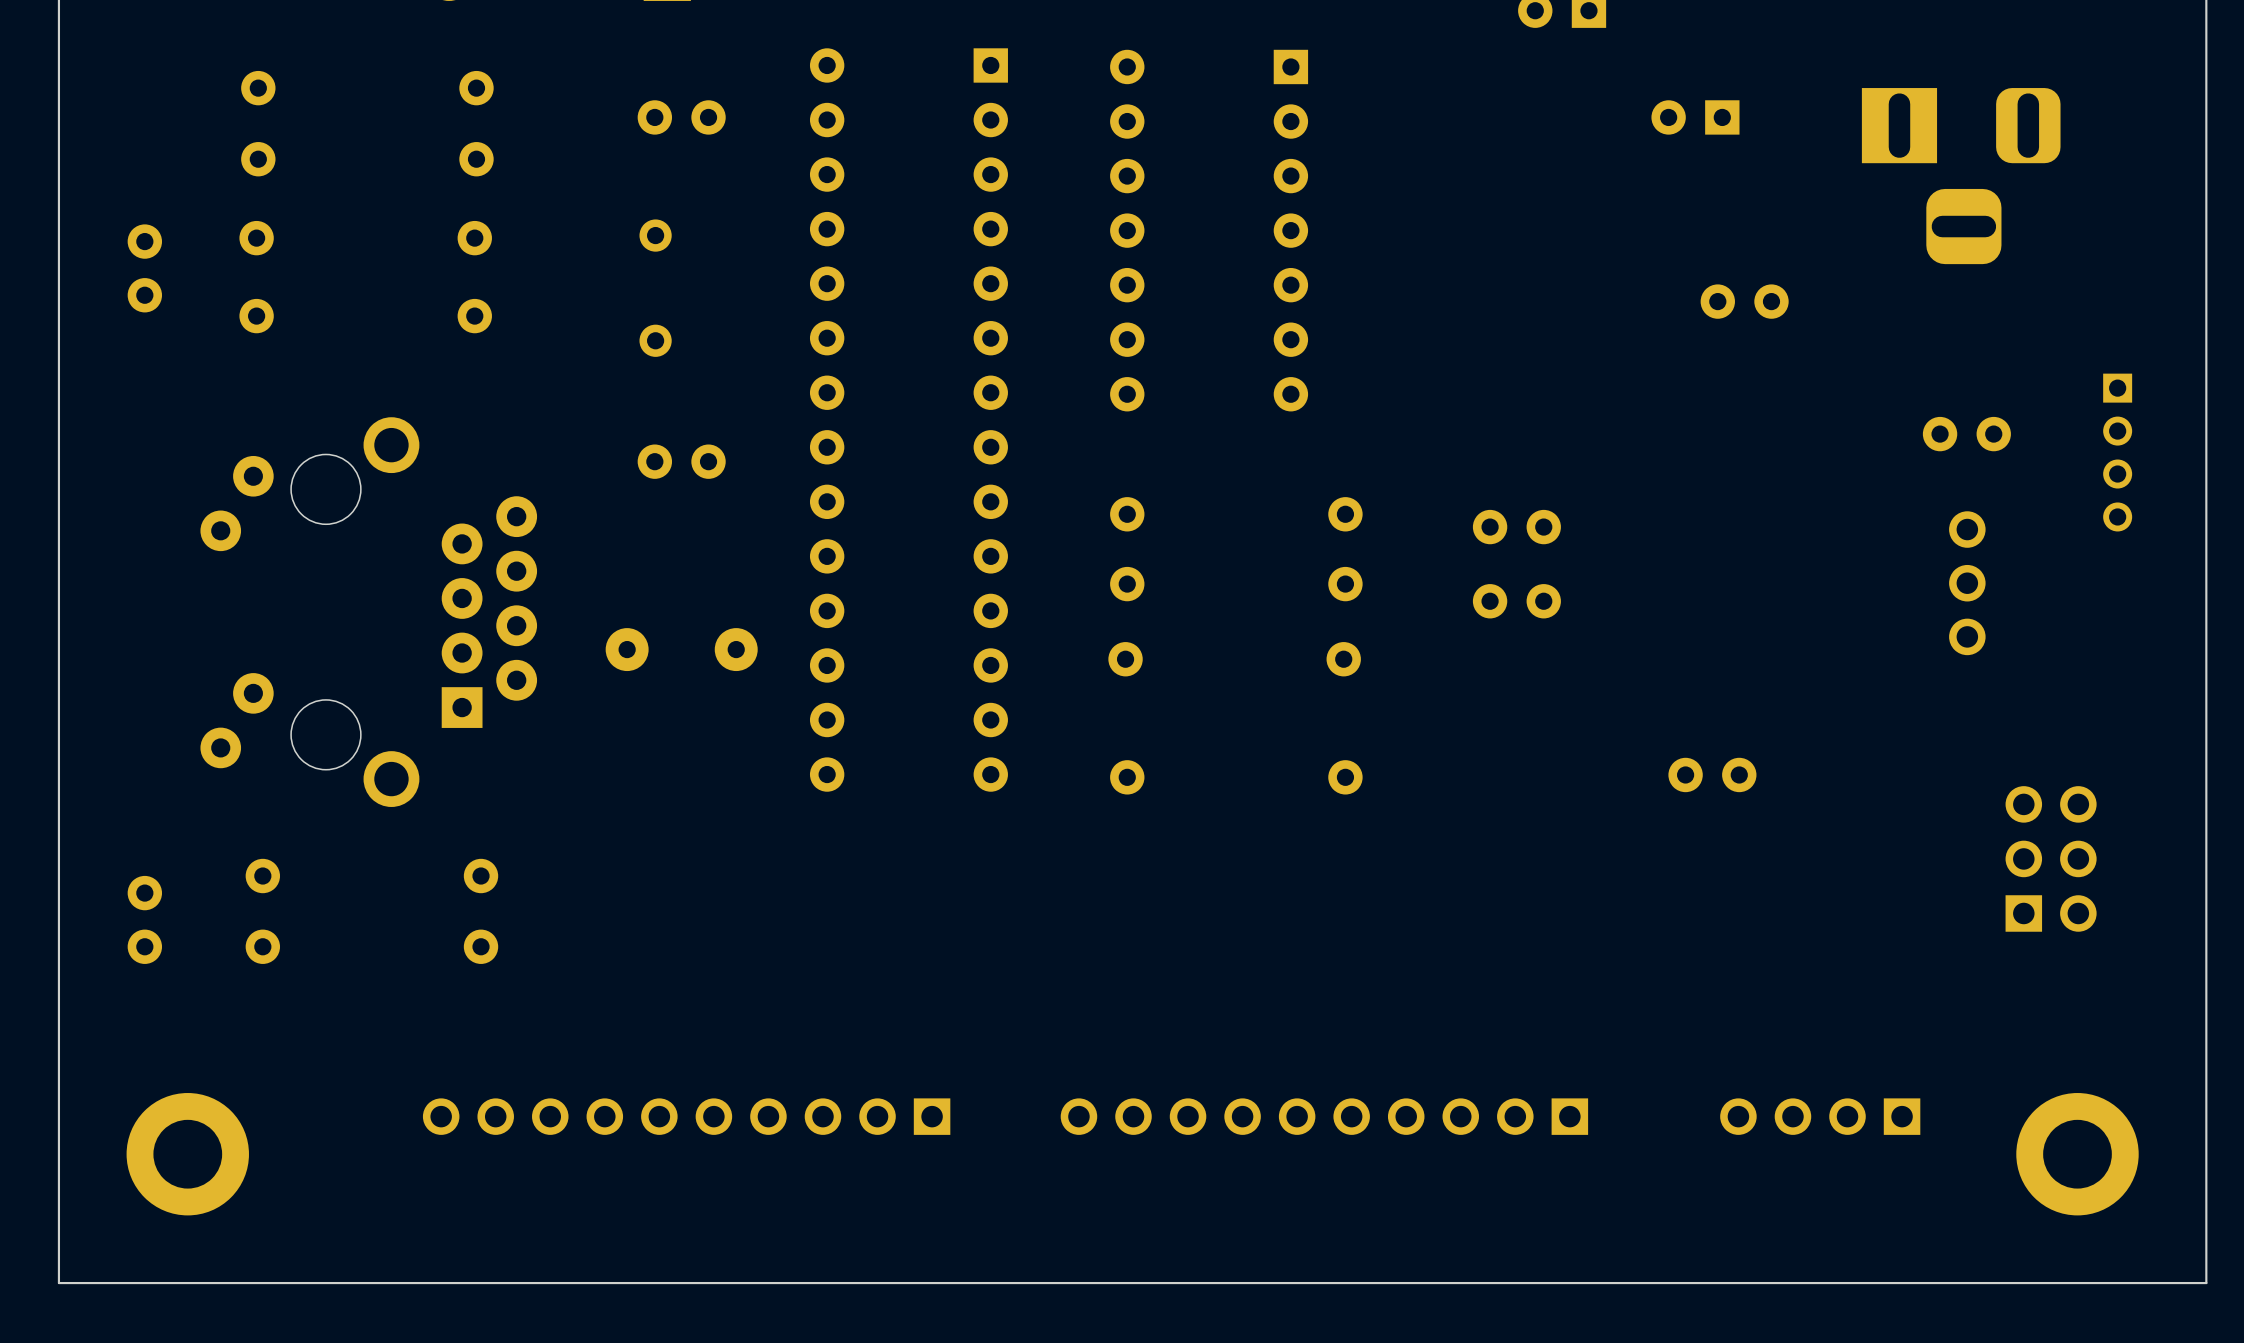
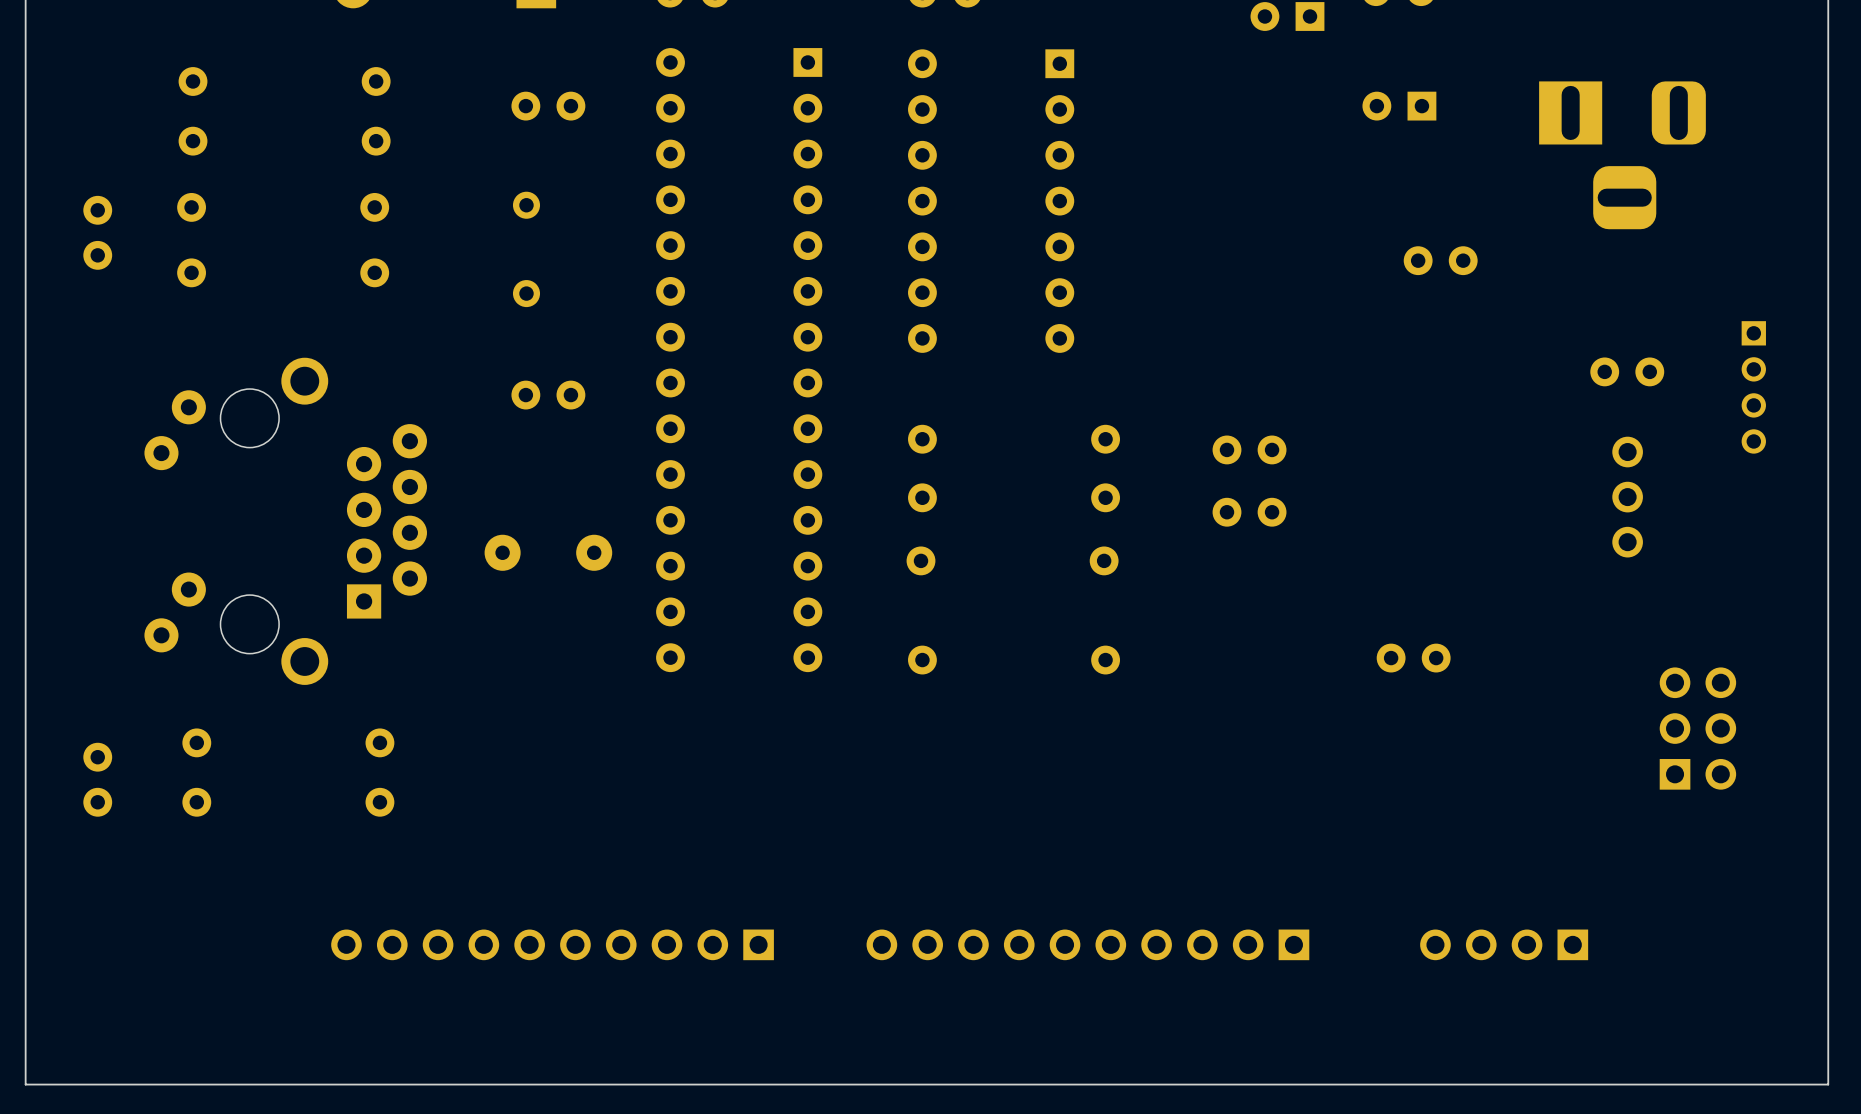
part: (187, 1154) -> none
part: (2077, 1154) -> none

